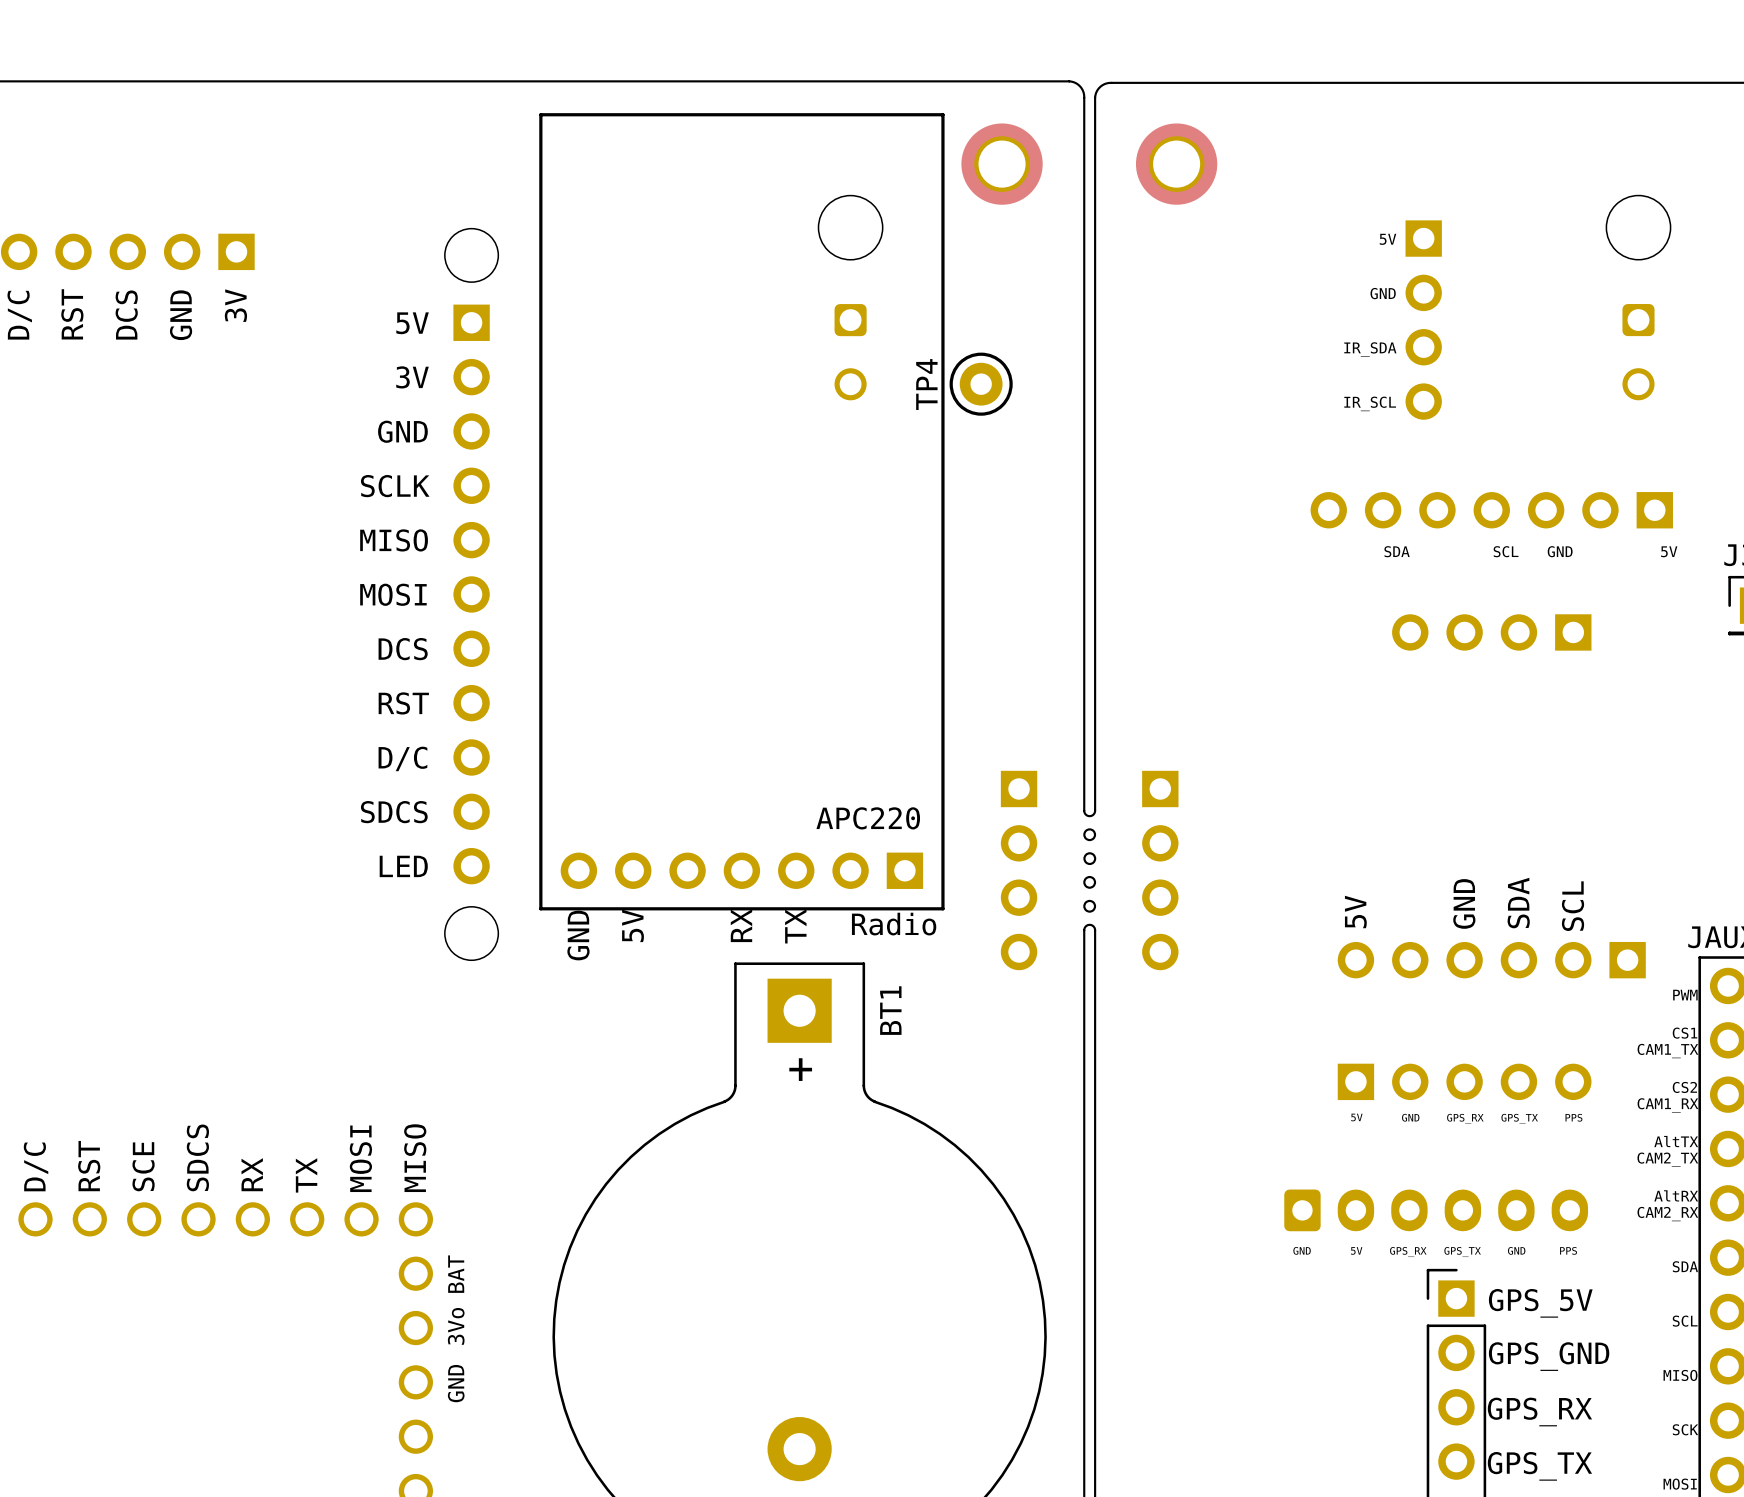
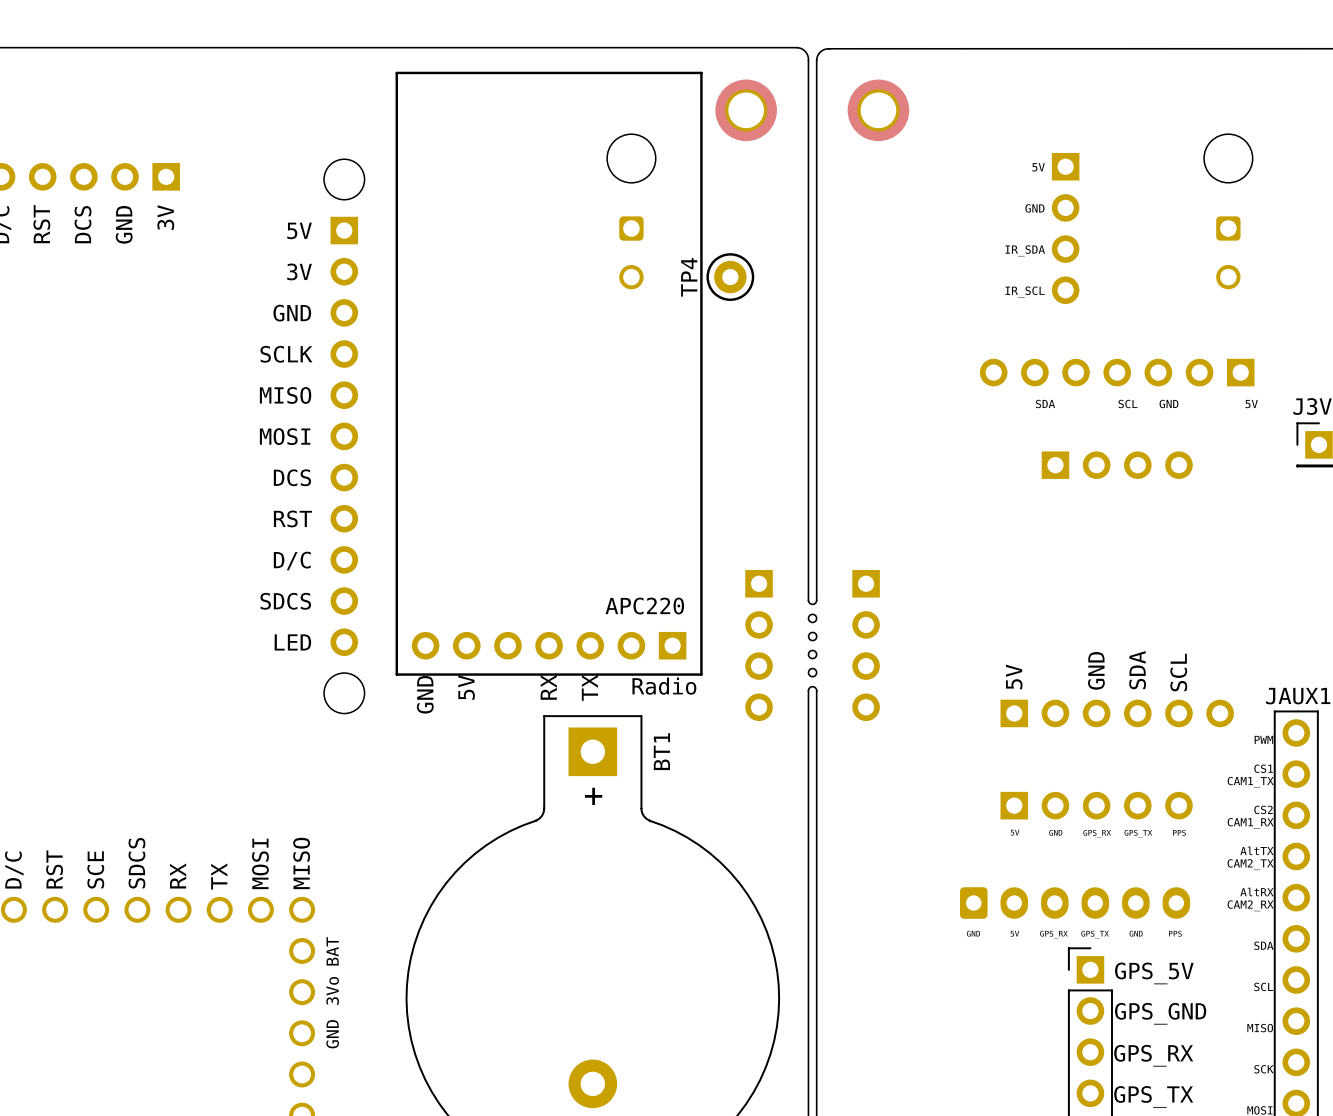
part rotation: 0° (1491, 632) -> 180° (1117, 465)
part rotation: 0° (1491, 960) -> 180° (1117, 713)

